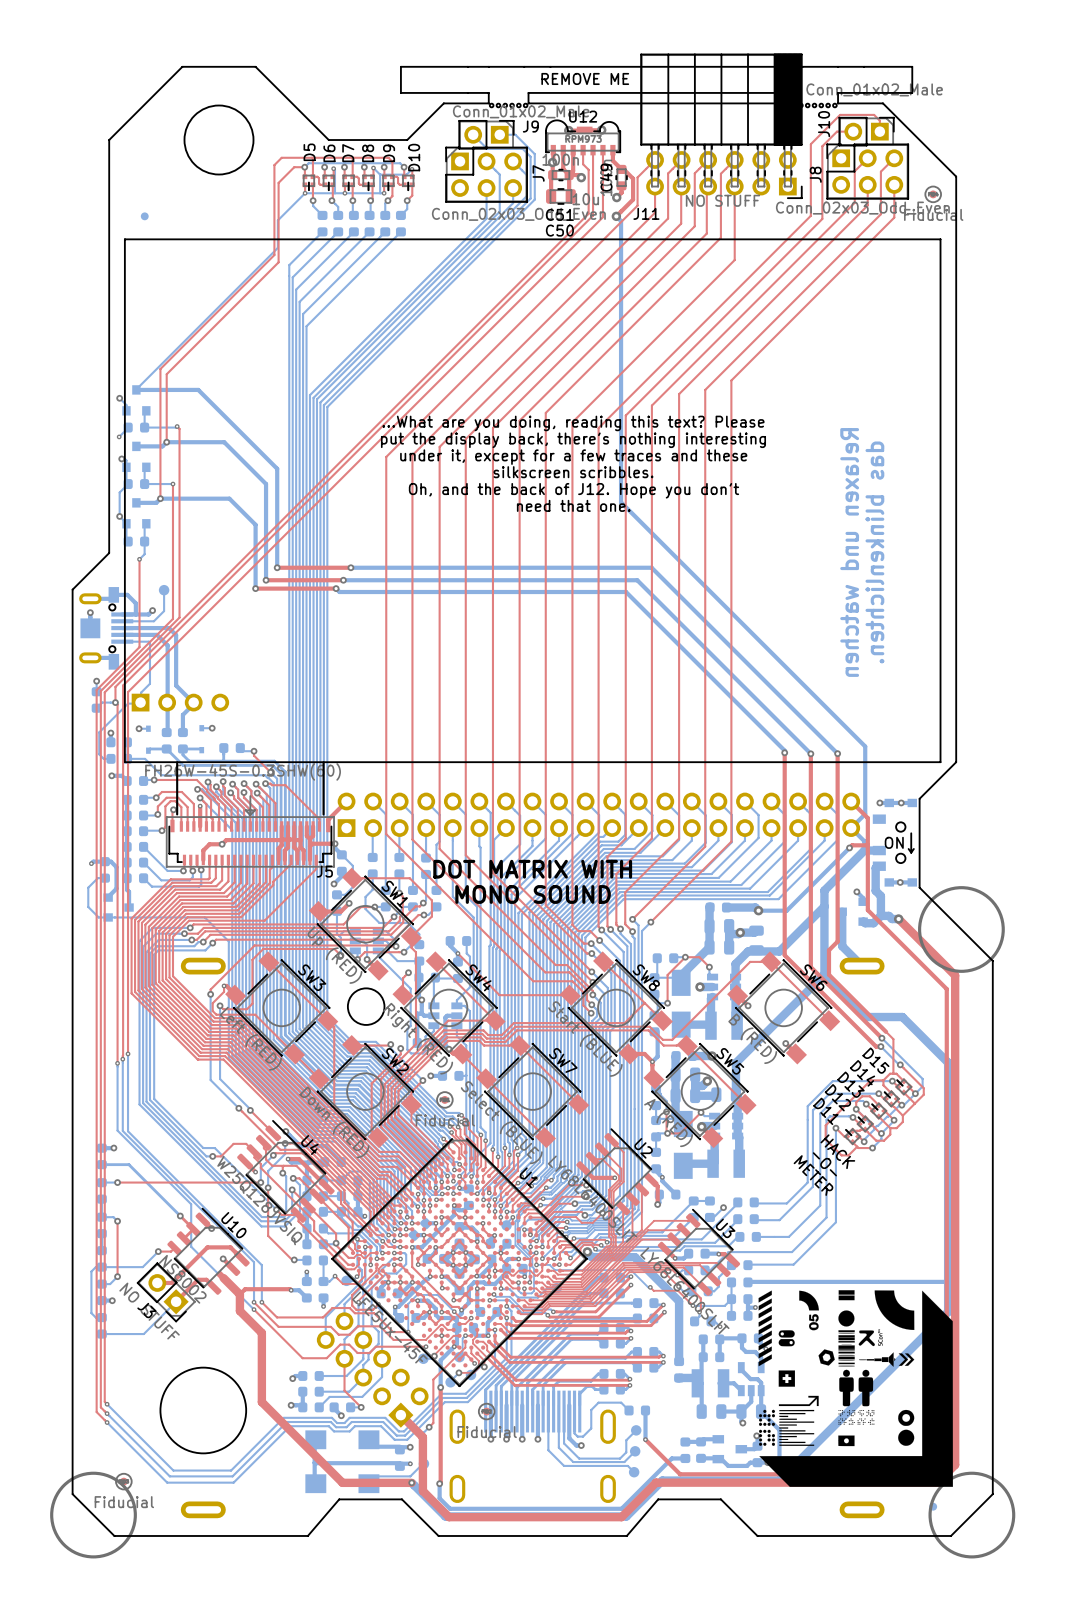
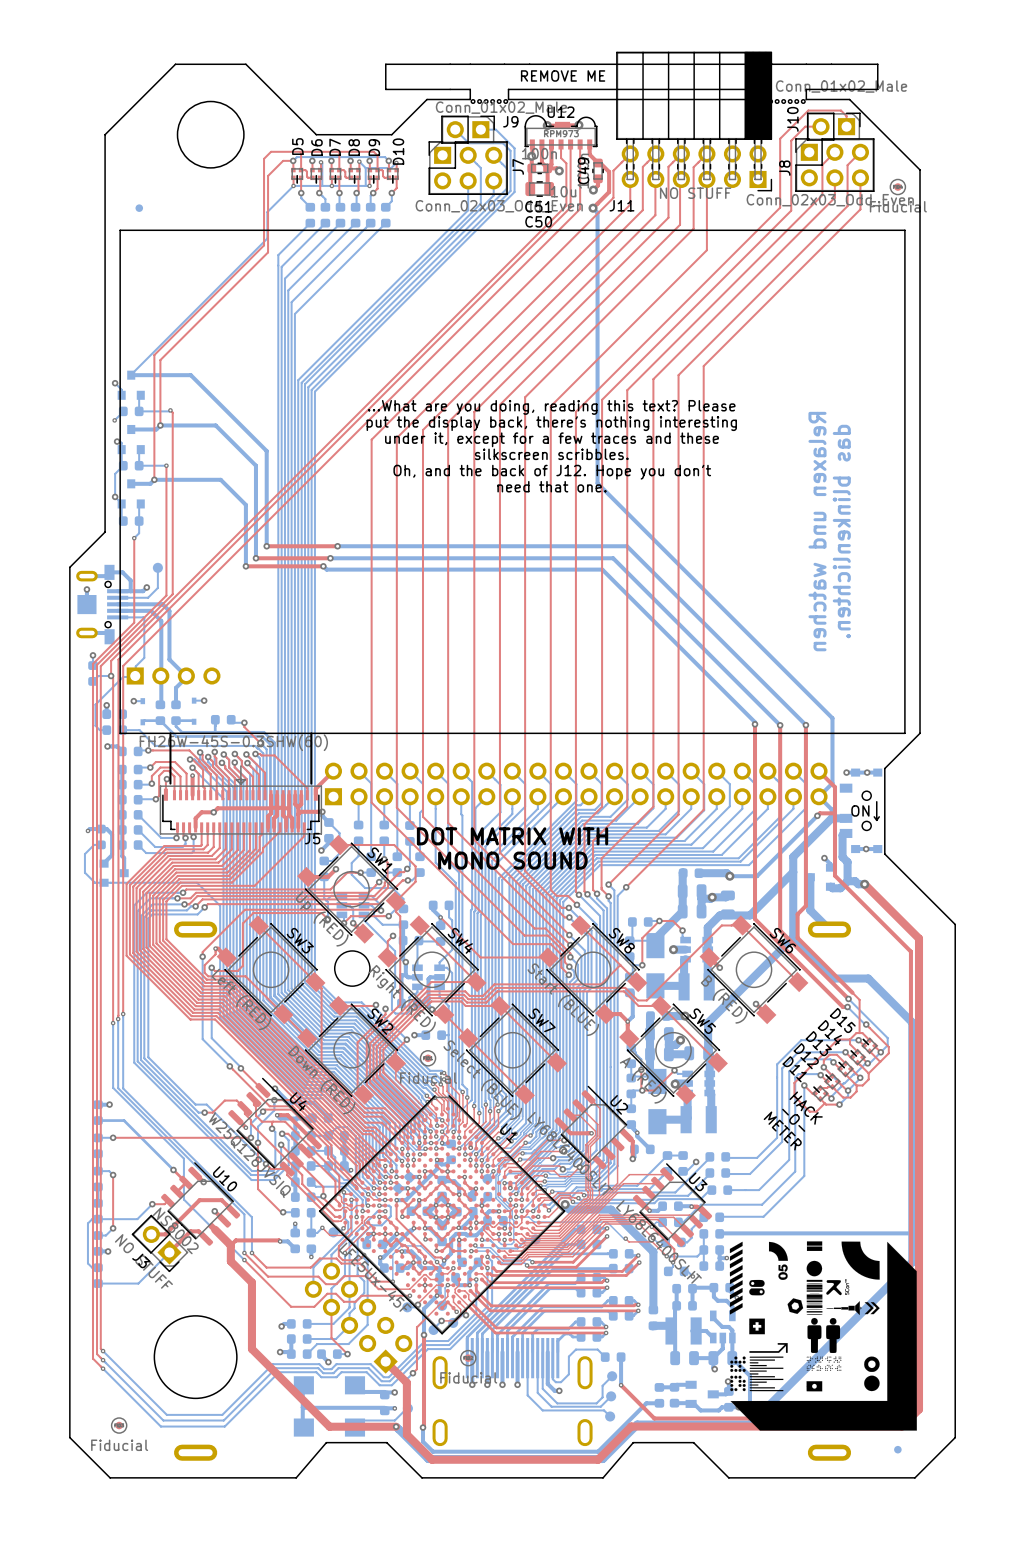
drawing: [918, 886, 1005, 973] -> none
drawing: [50, 1471, 137, 1559] -> none
drawing: [928, 1471, 1016, 1559] -> none

